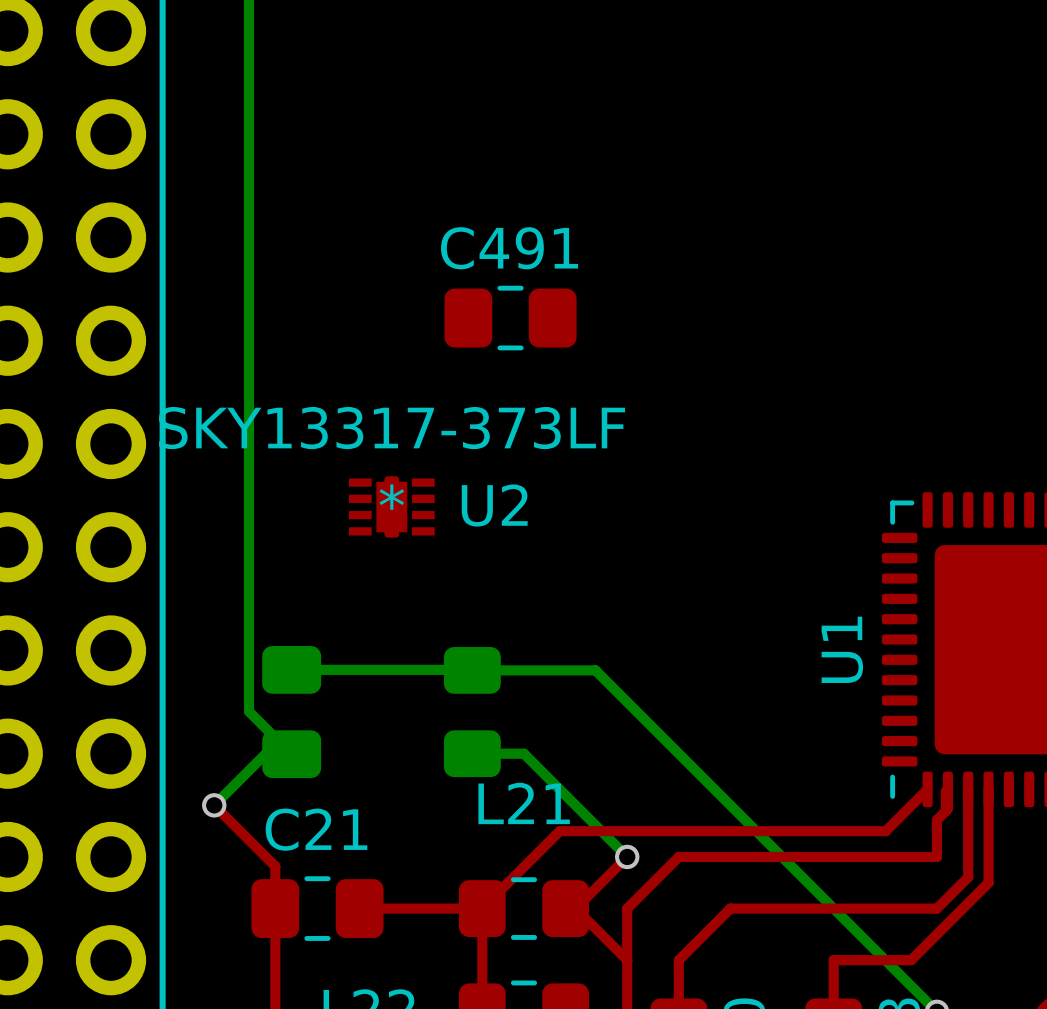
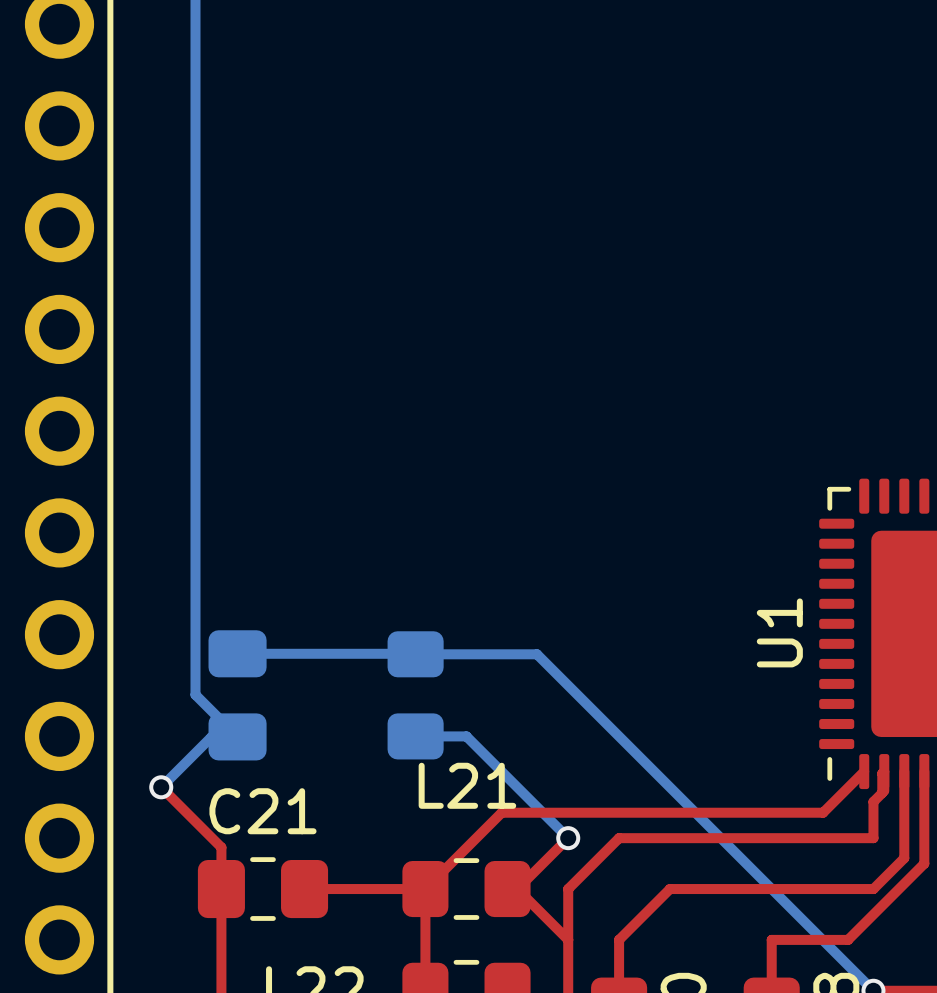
C491: (510, 318) -> none
U2: SKY13317-373LF (391, 506) -> none

